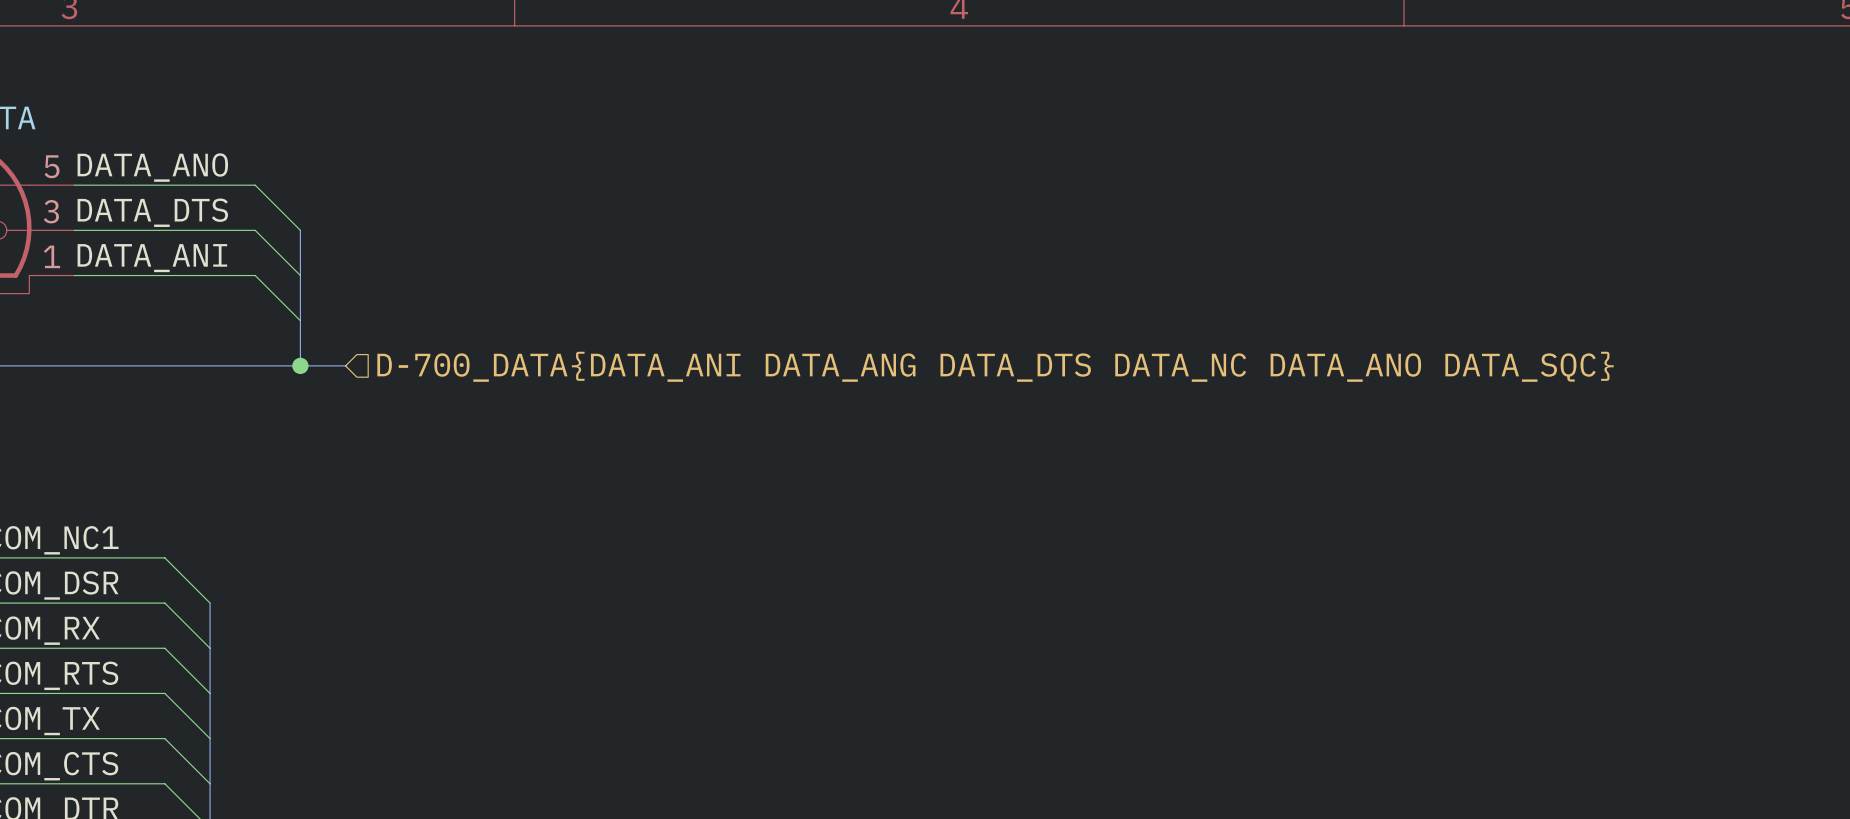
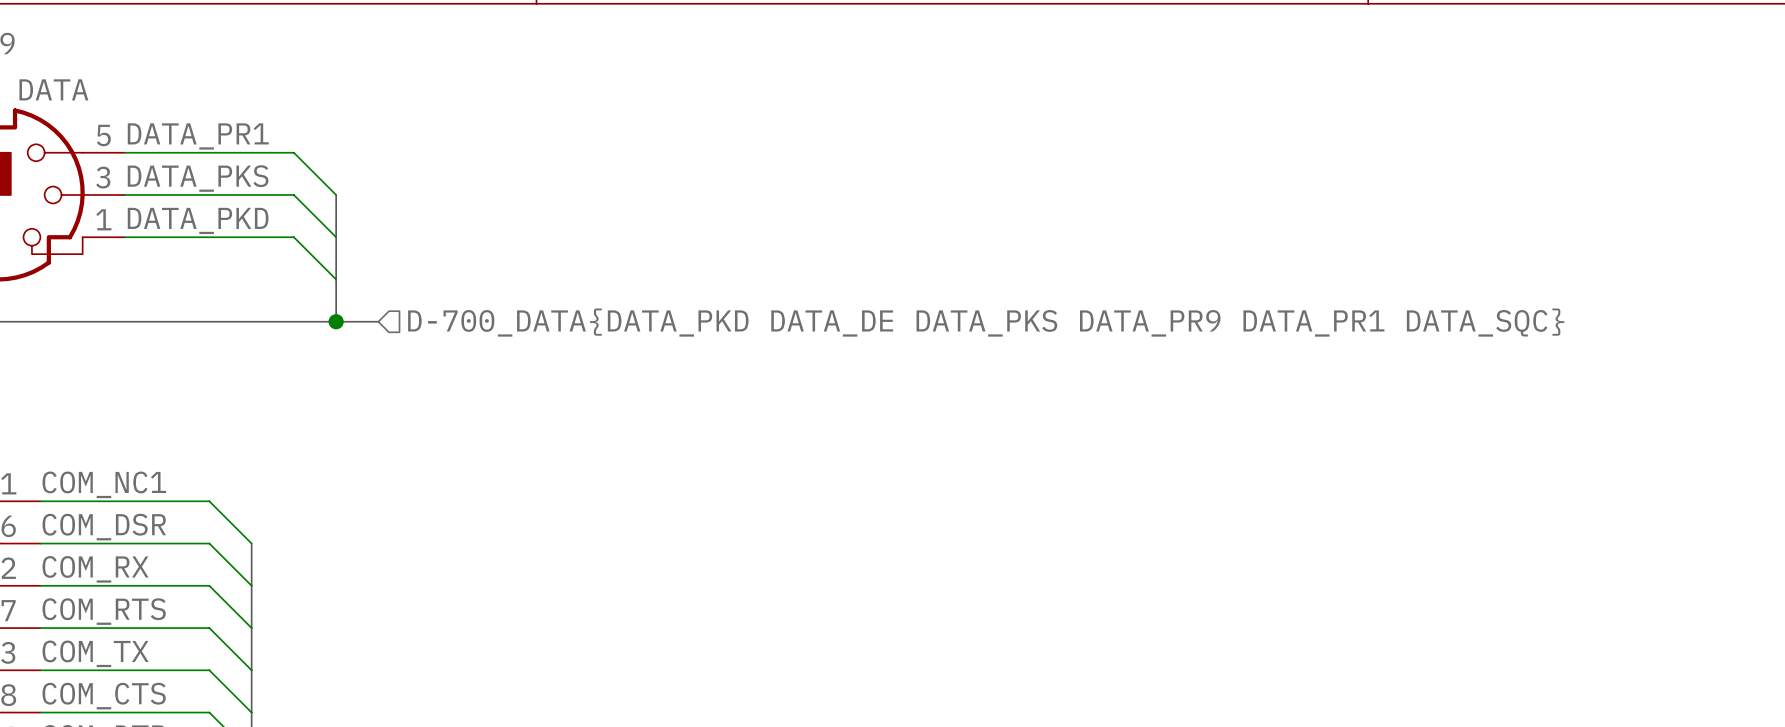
label: DATA_ANO (152, 167) -> DATA_PR1 (198, 136)
label: DATA_DTS (152, 212) -> DATA_PKS (198, 178)
label: DATA_ANI (152, 258) -> DATA_PKD (198, 220)
hierarchical label: D-700_DATA{DATA_ANI DATA_ANG DATA_DTS DATA_NC DATA_ANO DATA_SQC} (995, 366) -> D-700_DATA{DATA_PKD DATA_DE DATA_PKS DATA_PR9 DATA_PR1 DATA_SQC} (986, 322)

